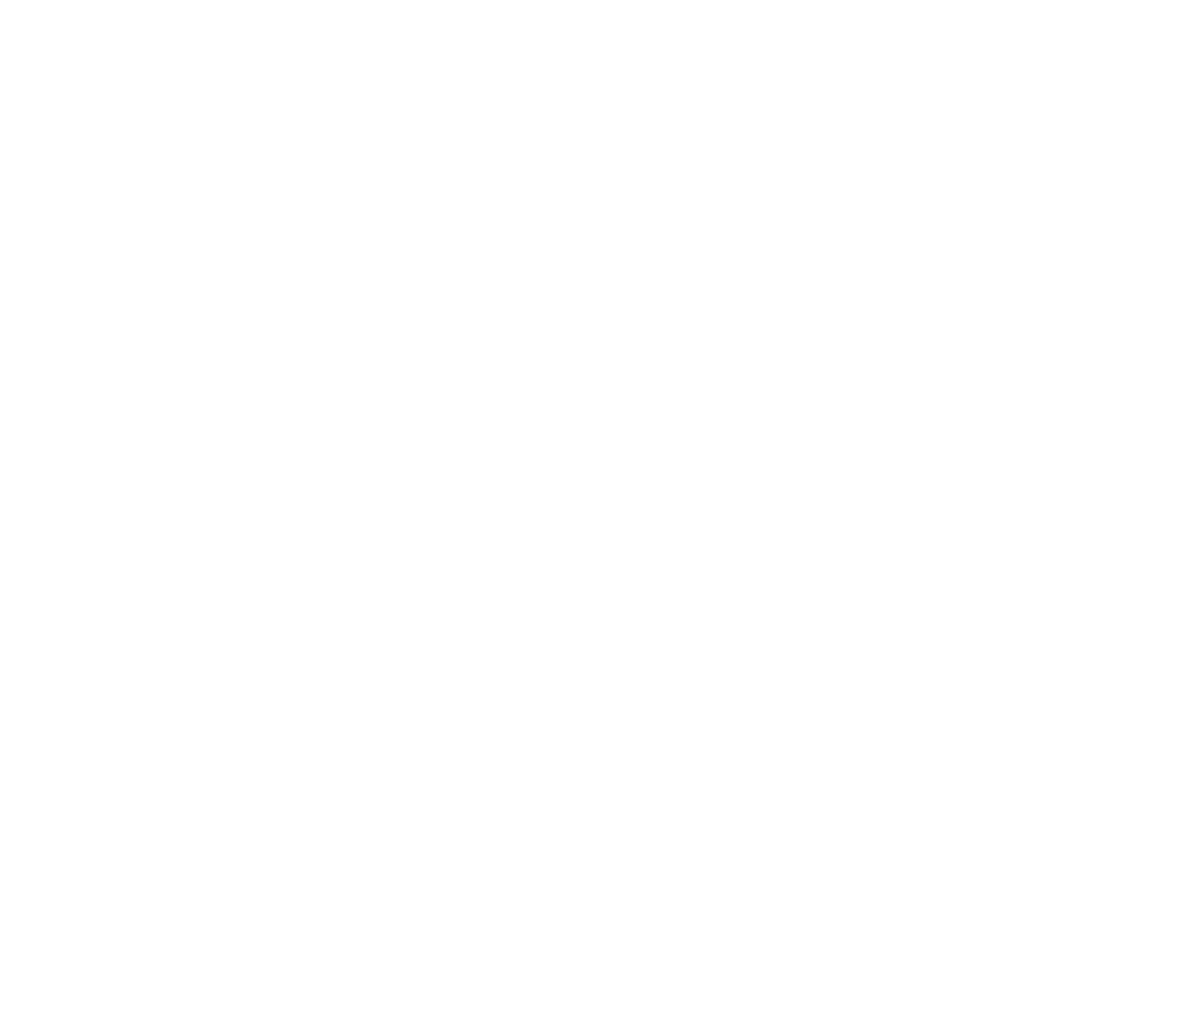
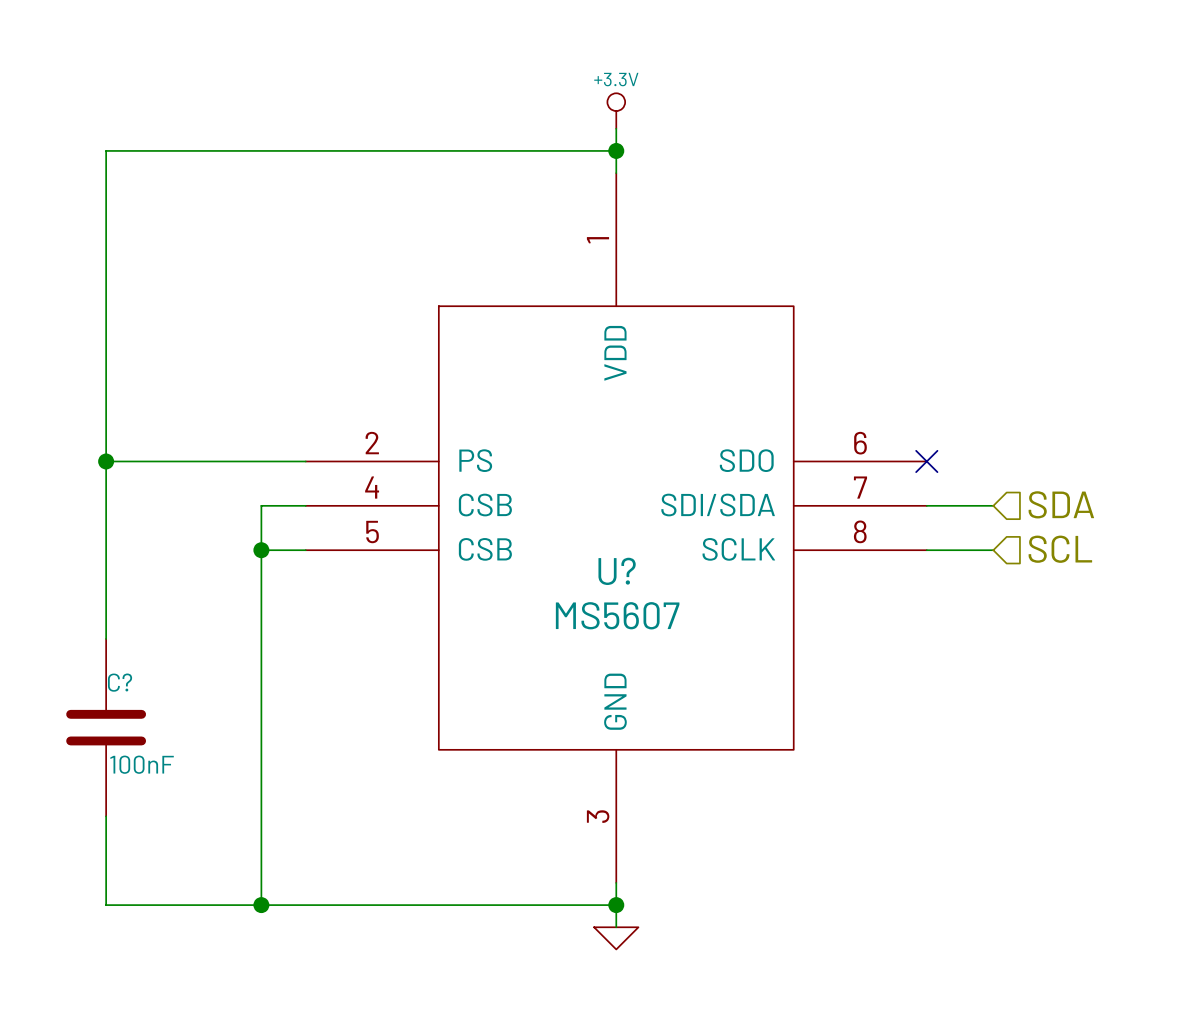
power symbol: none -> +3.3V (616, 111)
wire: none -> (616, 128) (616, 173)
wire: none -> (616, 150) (106, 150) (106, 638)
junction: none -> (616, 150)
wire: none -> (106, 461) (305, 461)
junction: none -> (106, 461)
no-connect mark: none -> (926, 461)
hierarchical label: none -> SDA (1061, 504)
wire: none -> (305, 505) (261, 505) (261, 905)
wire: none -> (926, 505) (993, 505)
U?: none -> MS5607 (616, 528)
hierarchical label: none -> SCL (1060, 549)
wire: none -> (261, 550) (305, 550)
junction: none -> (261, 550)
wire: none -> (926, 550) (993, 550)
C?: none -> 100nF (106, 727)
wire: none -> (106, 816) (106, 905) (616, 905)
wire: none -> (616, 882) (616, 927)
junction: none -> (261, 905)
junction: none -> (616, 905)
power symbol: none -> (616, 938)

